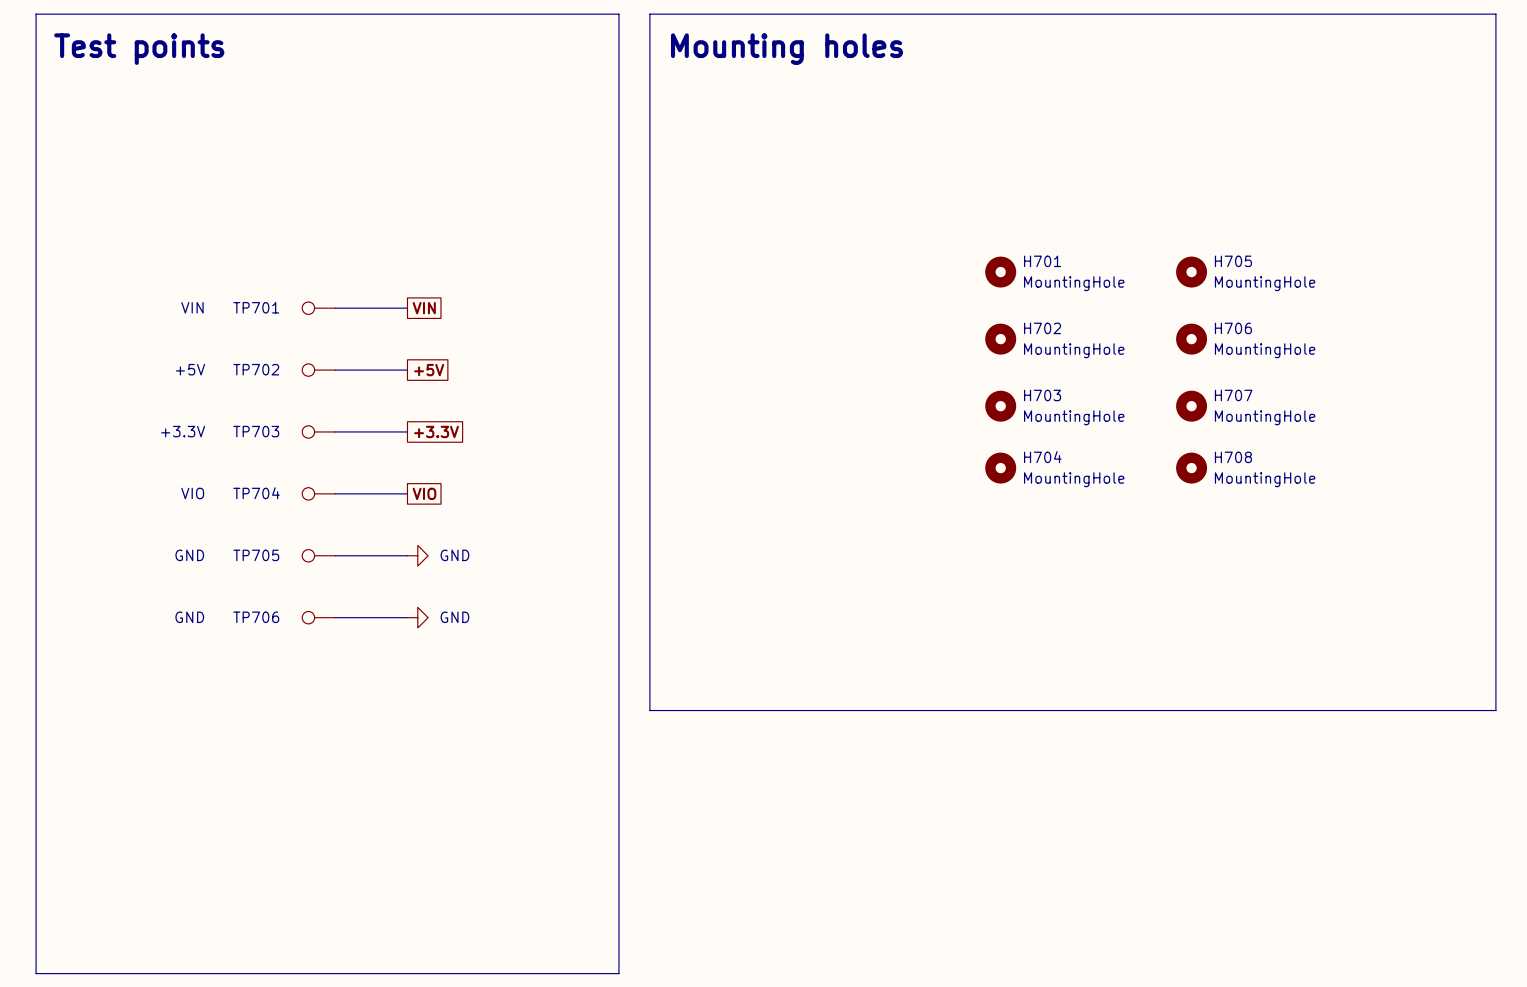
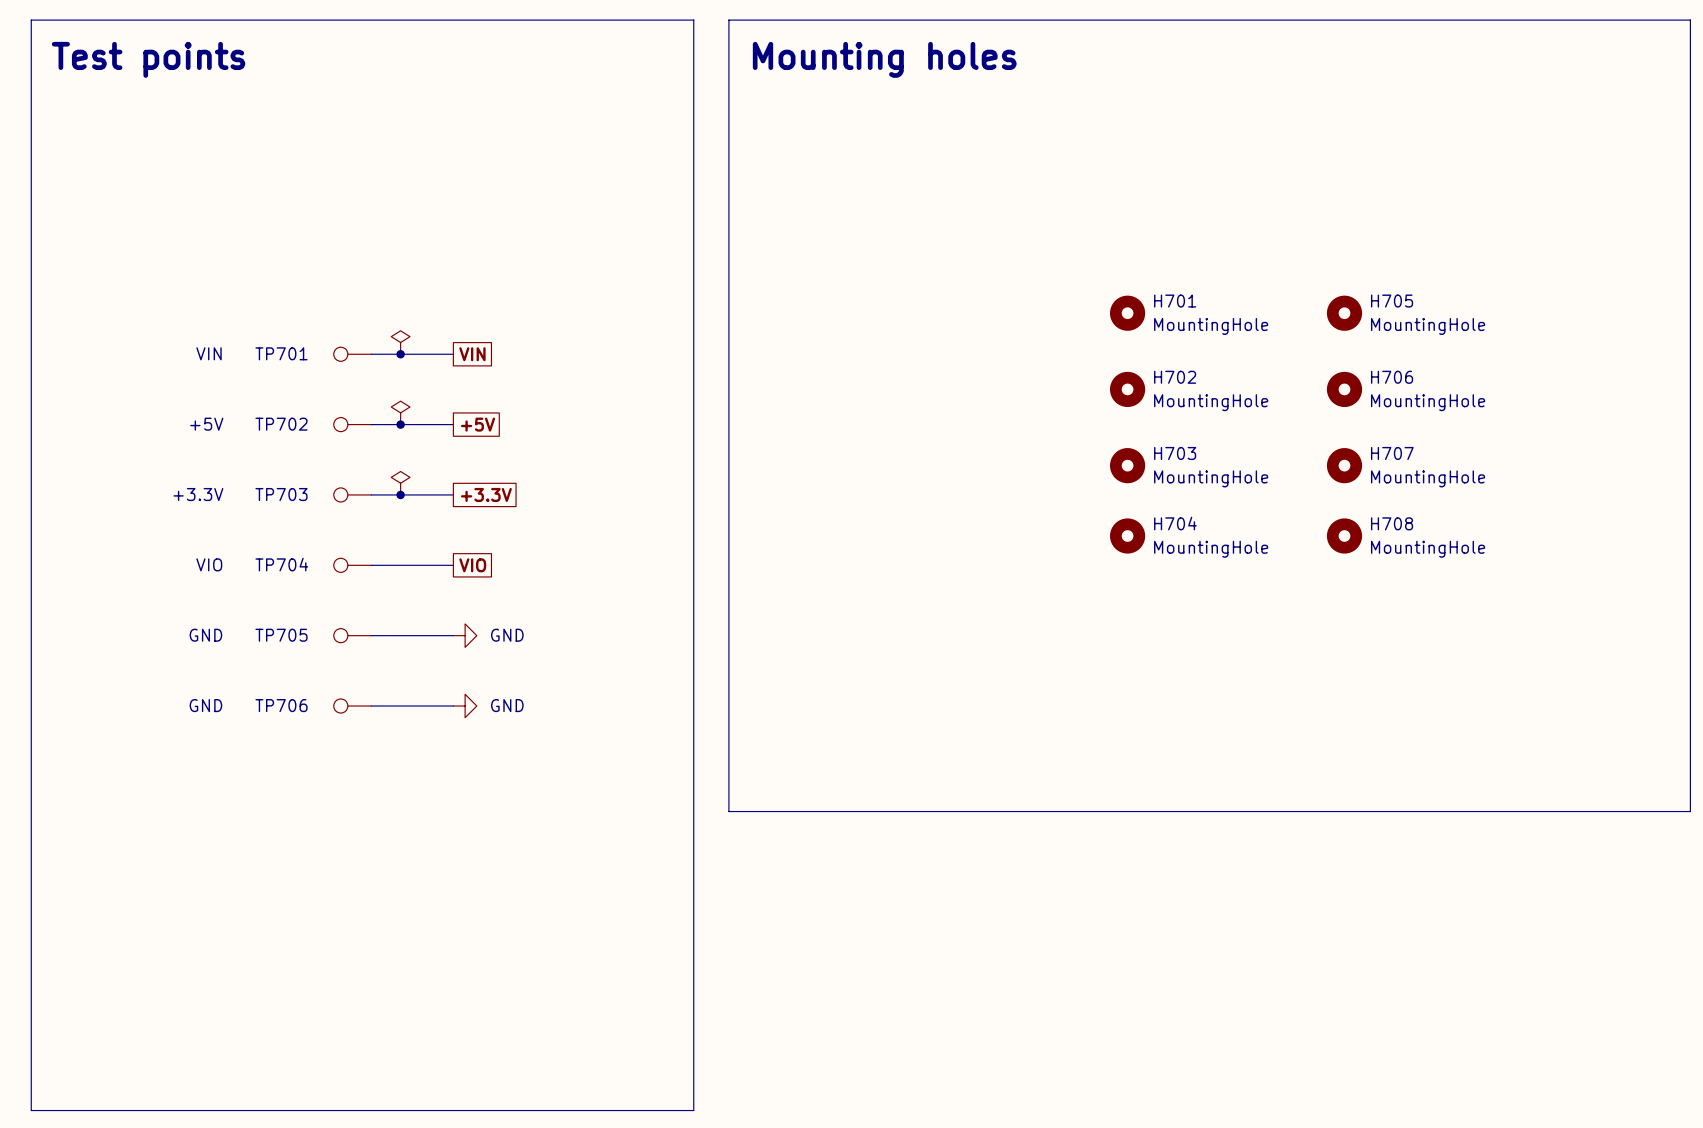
power symbol: none -> (400, 342)
junction: none -> (400, 354)
power symbol: none -> (400, 412)
junction: none -> (400, 424)
power symbol: none -> (400, 483)
junction: none -> (400, 494)

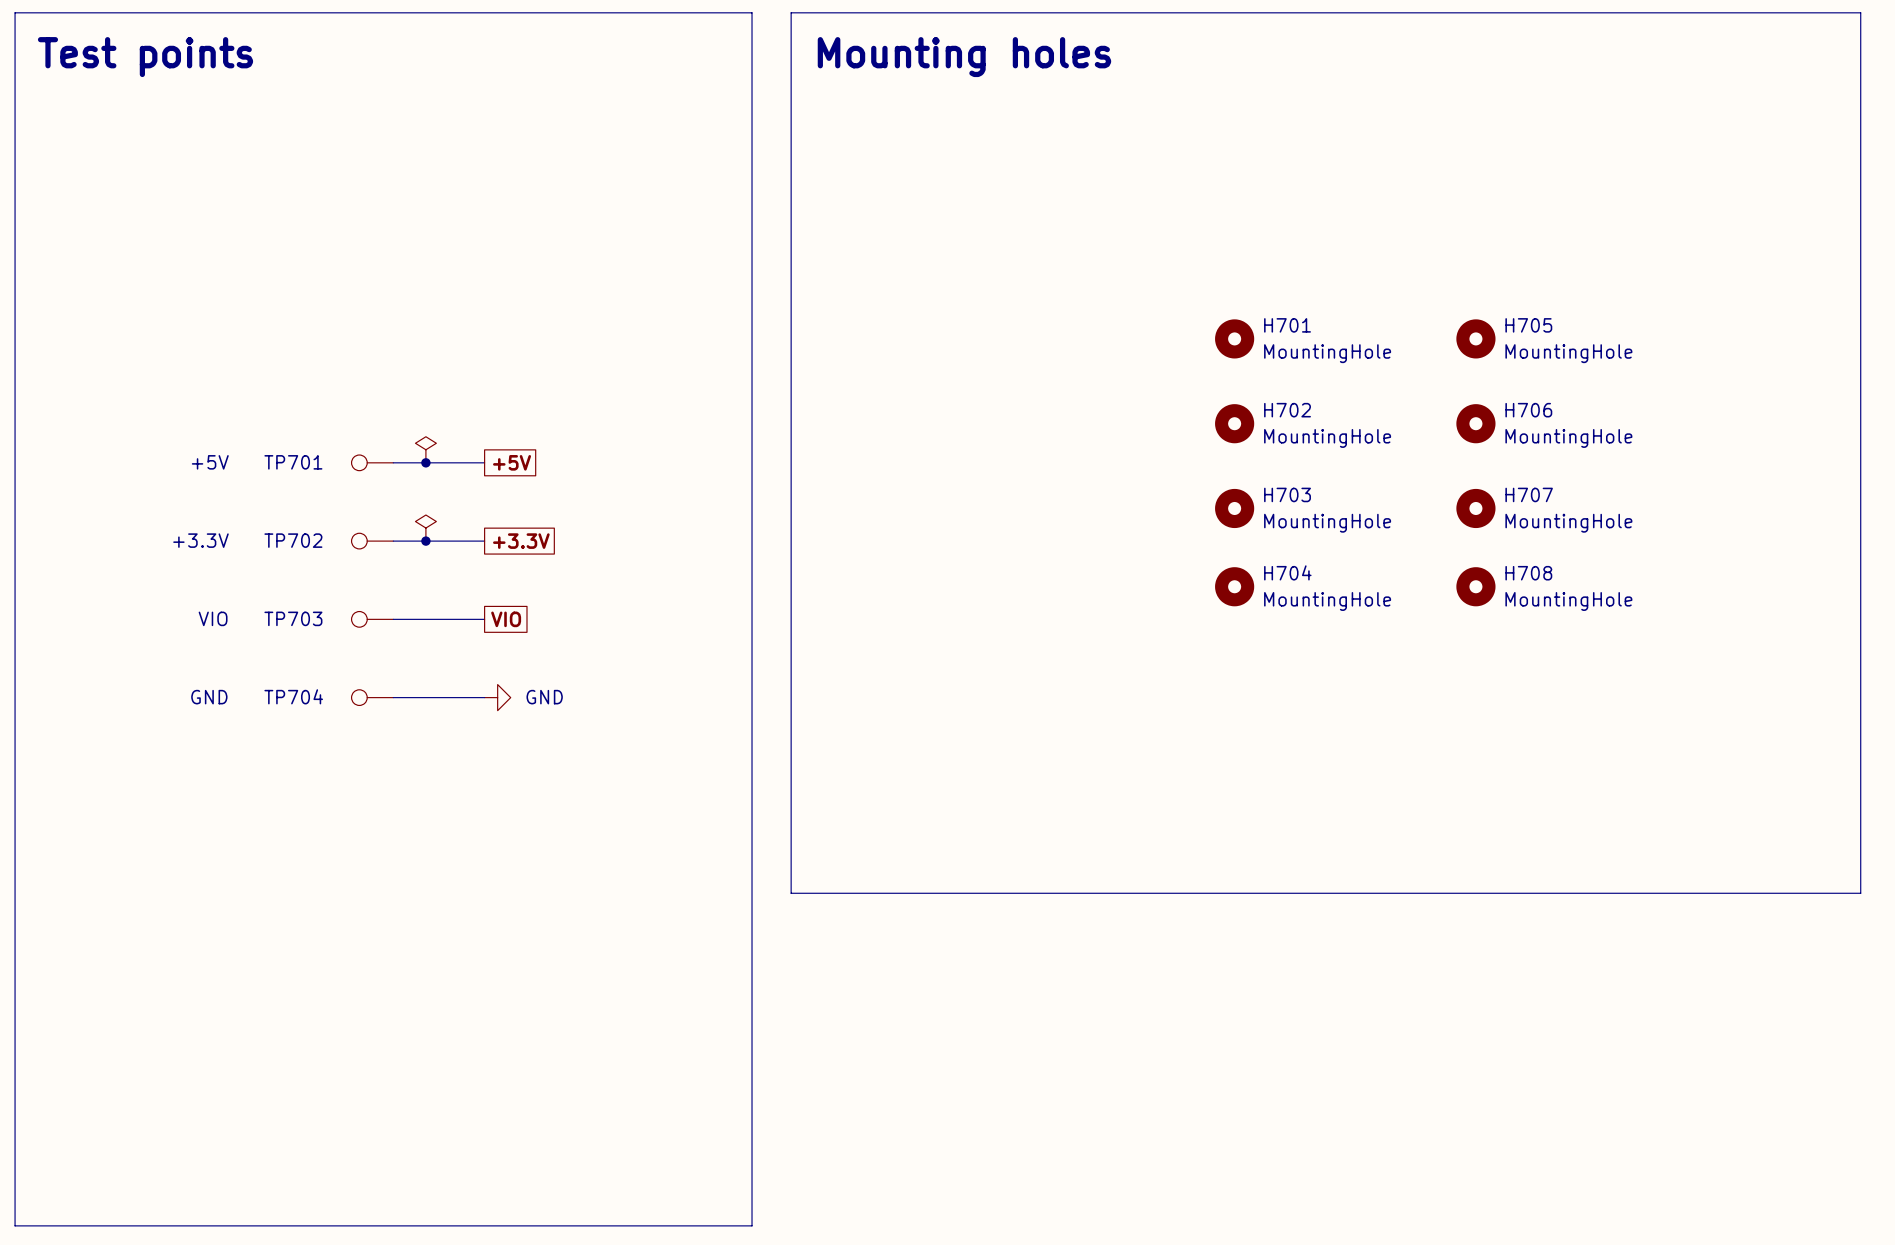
power symbol: (400, 342) -> none
TP701: VIN (352, 354) -> none
wire: (371, 354) (453, 354) -> none
junction: (400, 354) -> none
global label: VIN (472, 354) -> none
TP702 name: TP702 (281, 424) -> TP701 (293, 462)
TP703 name: TP703 (281, 494) -> TP702 (293, 540)
TP704 name: TP704 (281, 564) -> TP703 (293, 618)
TP705 name: TP705 (281, 635) -> TP704 (293, 696)
TP706: GND (352, 706) -> none
wire: (371, 706) (453, 706) -> none
power symbol: GND (465, 706) -> none

